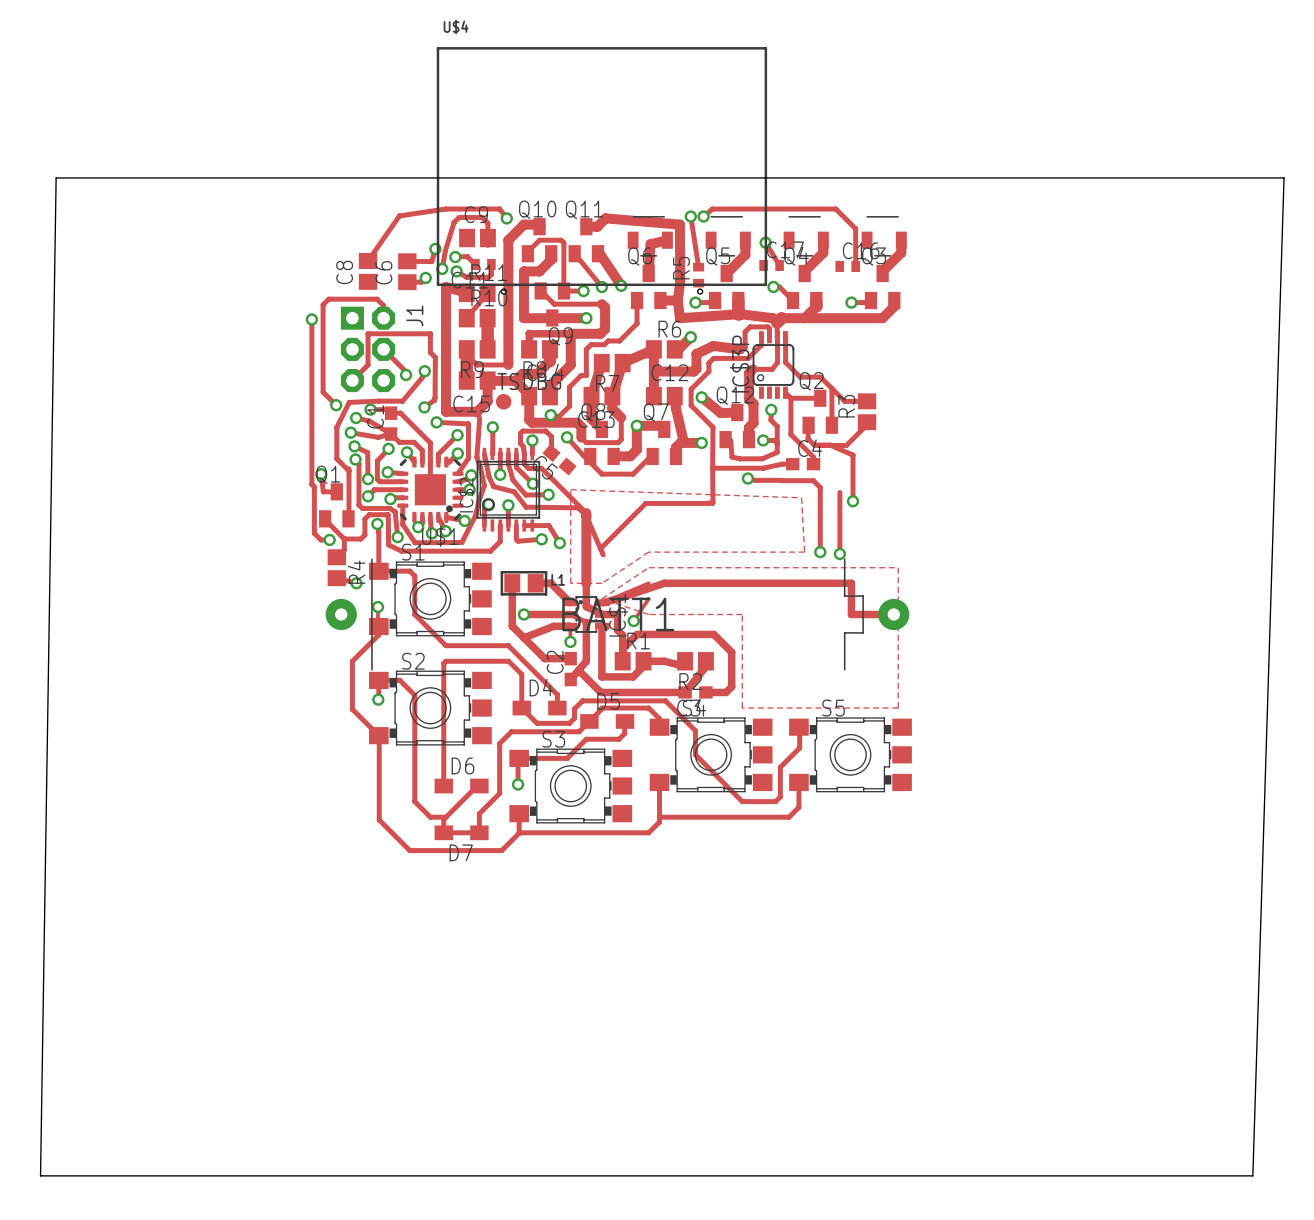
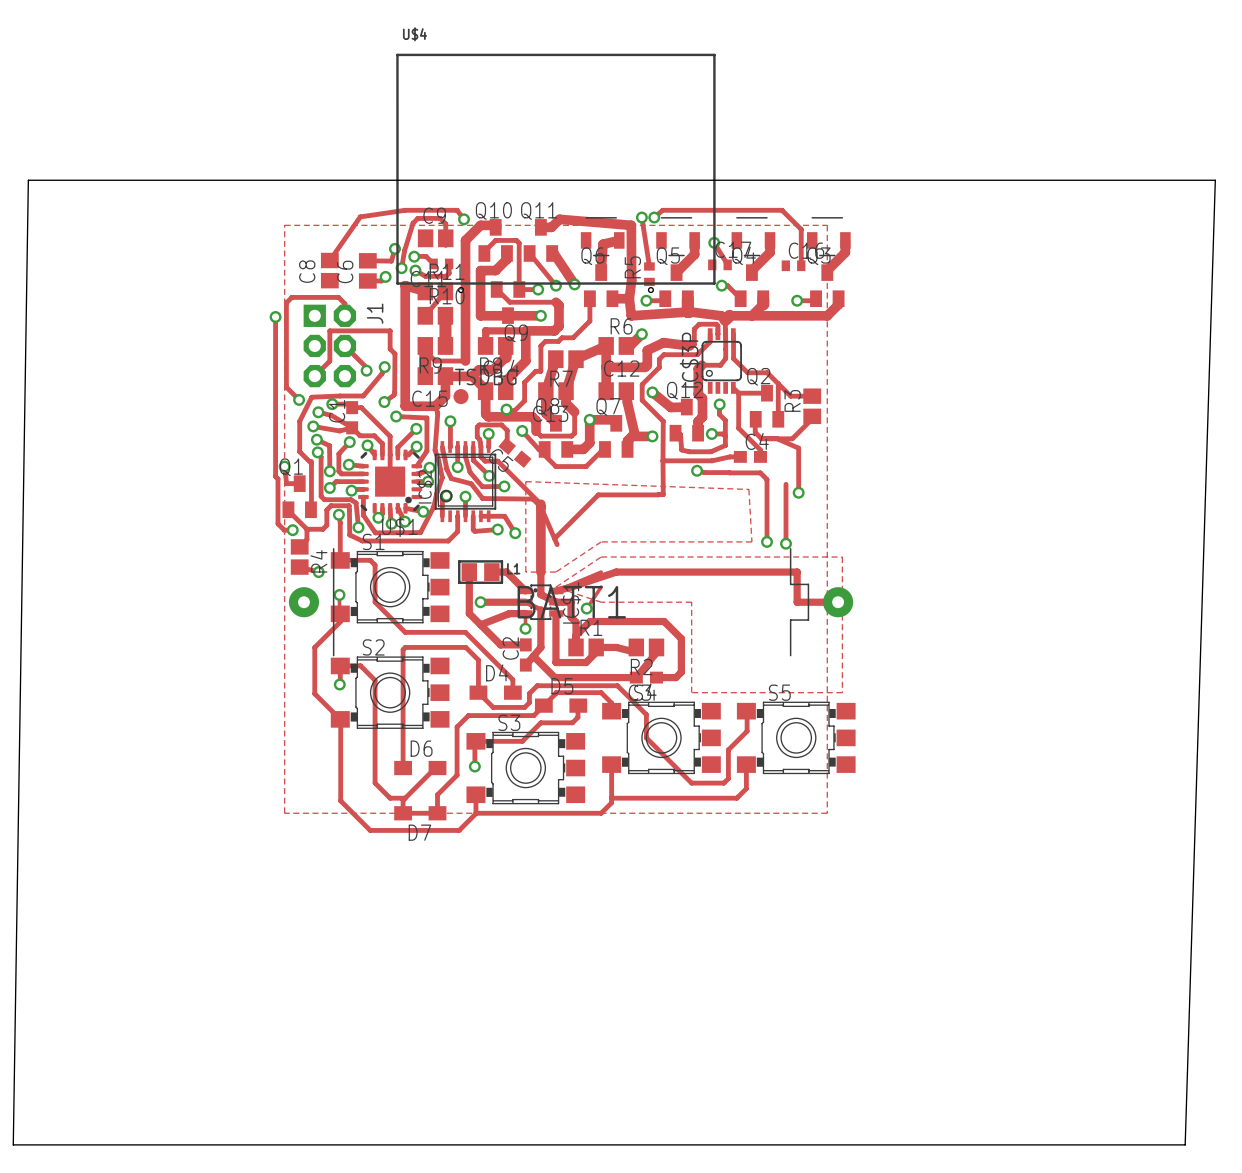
zone outline: none -> (284, 225) (827, 225) (827, 813) (284, 813) (284, 225)

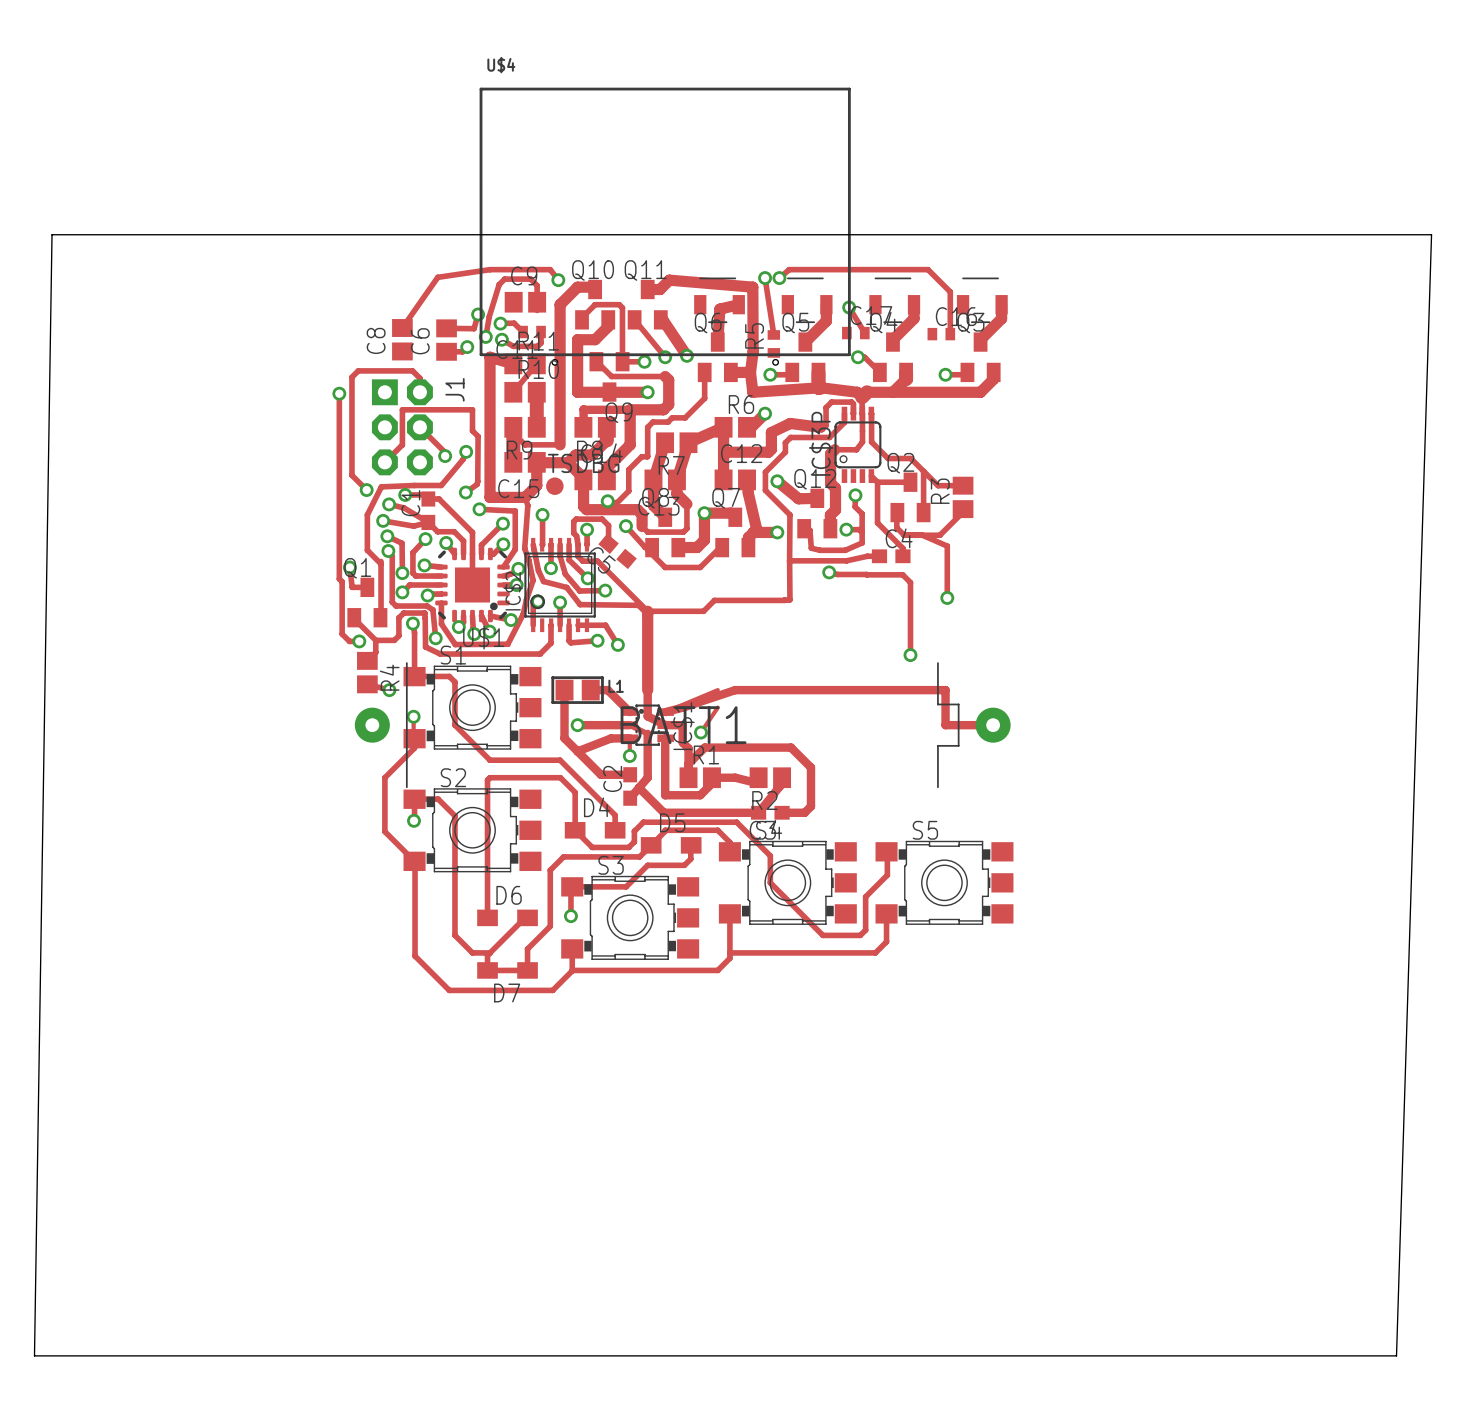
zone outline: (284, 225) (827, 225) (827, 813) (284, 813) (284, 225) -> none
zone outline: (525, 481) (525, 572) (555, 572) (601, 541) (751, 541) (748, 489) (525, 481) -> none
track: (786, 484) (786, 543) -> none
track: (589, 504) (554, 538) -> (703, 611) (647, 611)
track: (540, 506) (557, 544) -> none
via: (786, 543) -> none
zone outline: (601, 557) (555, 587) (601, 602) (691, 602) (691, 692) (842, 692) (842, 557) (601, 557) -> none

